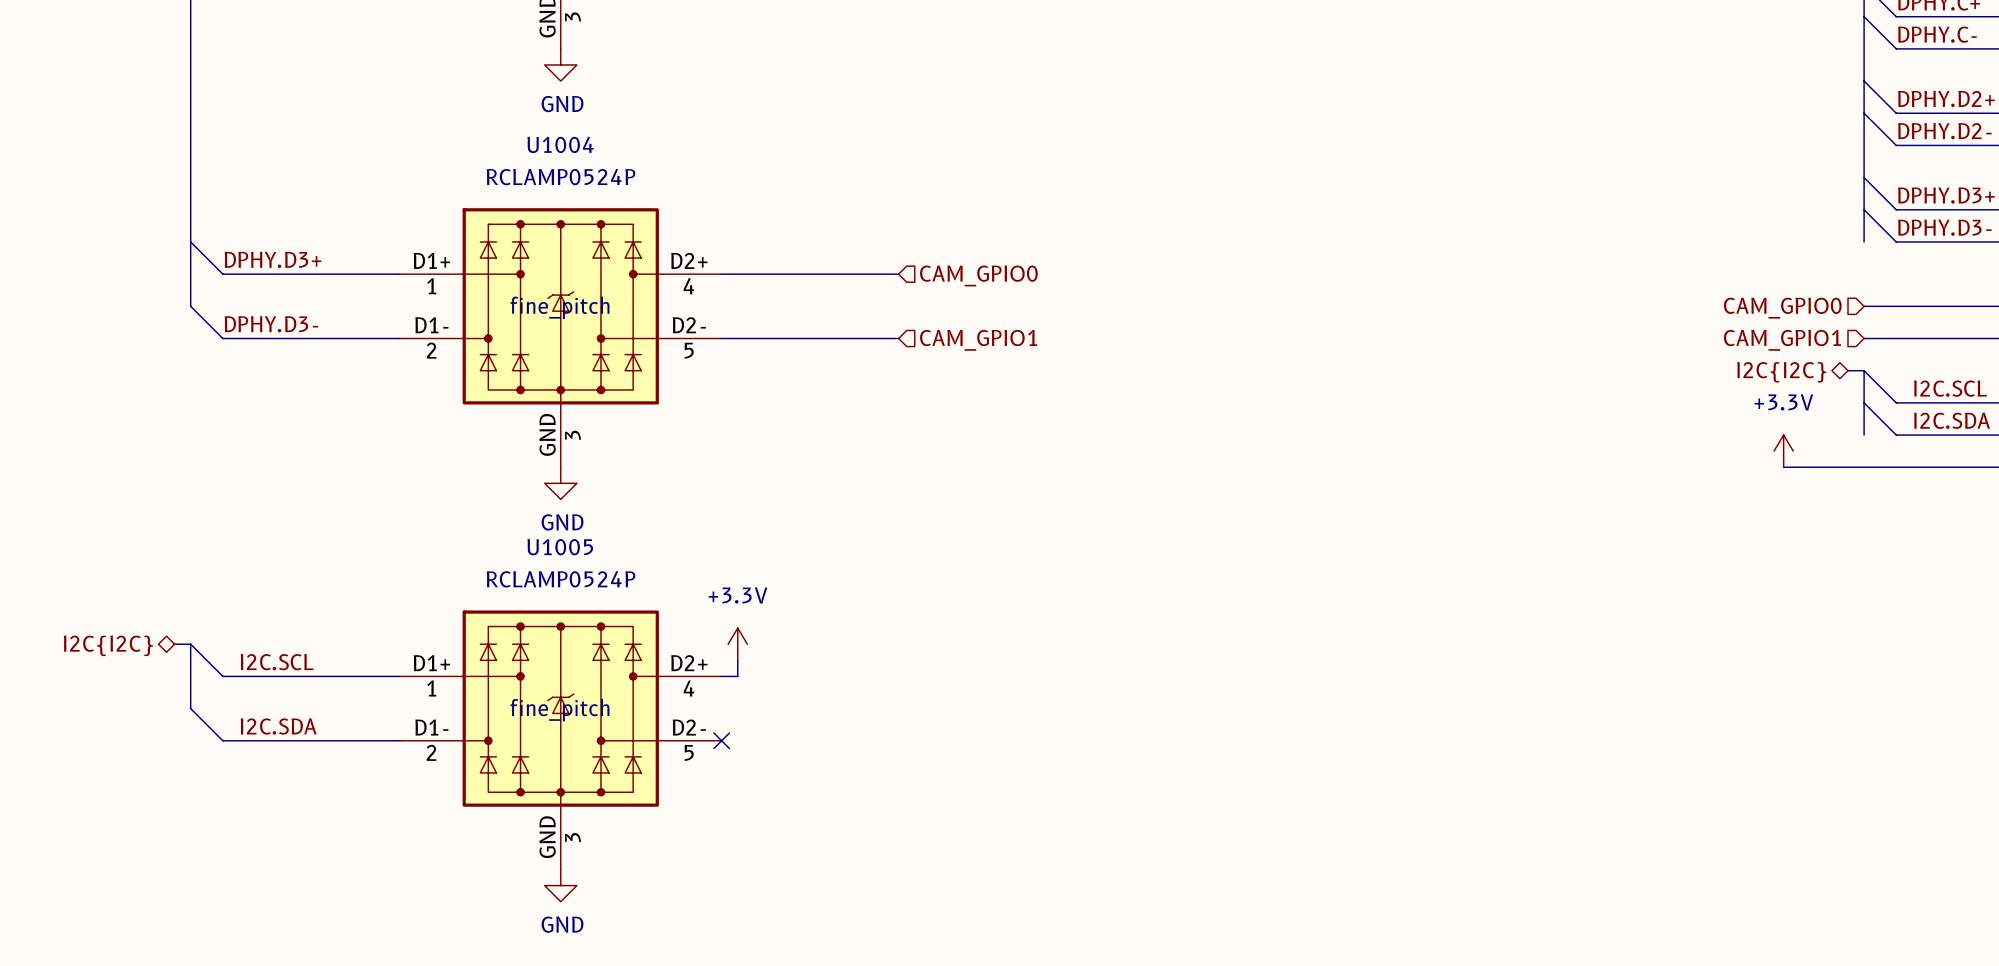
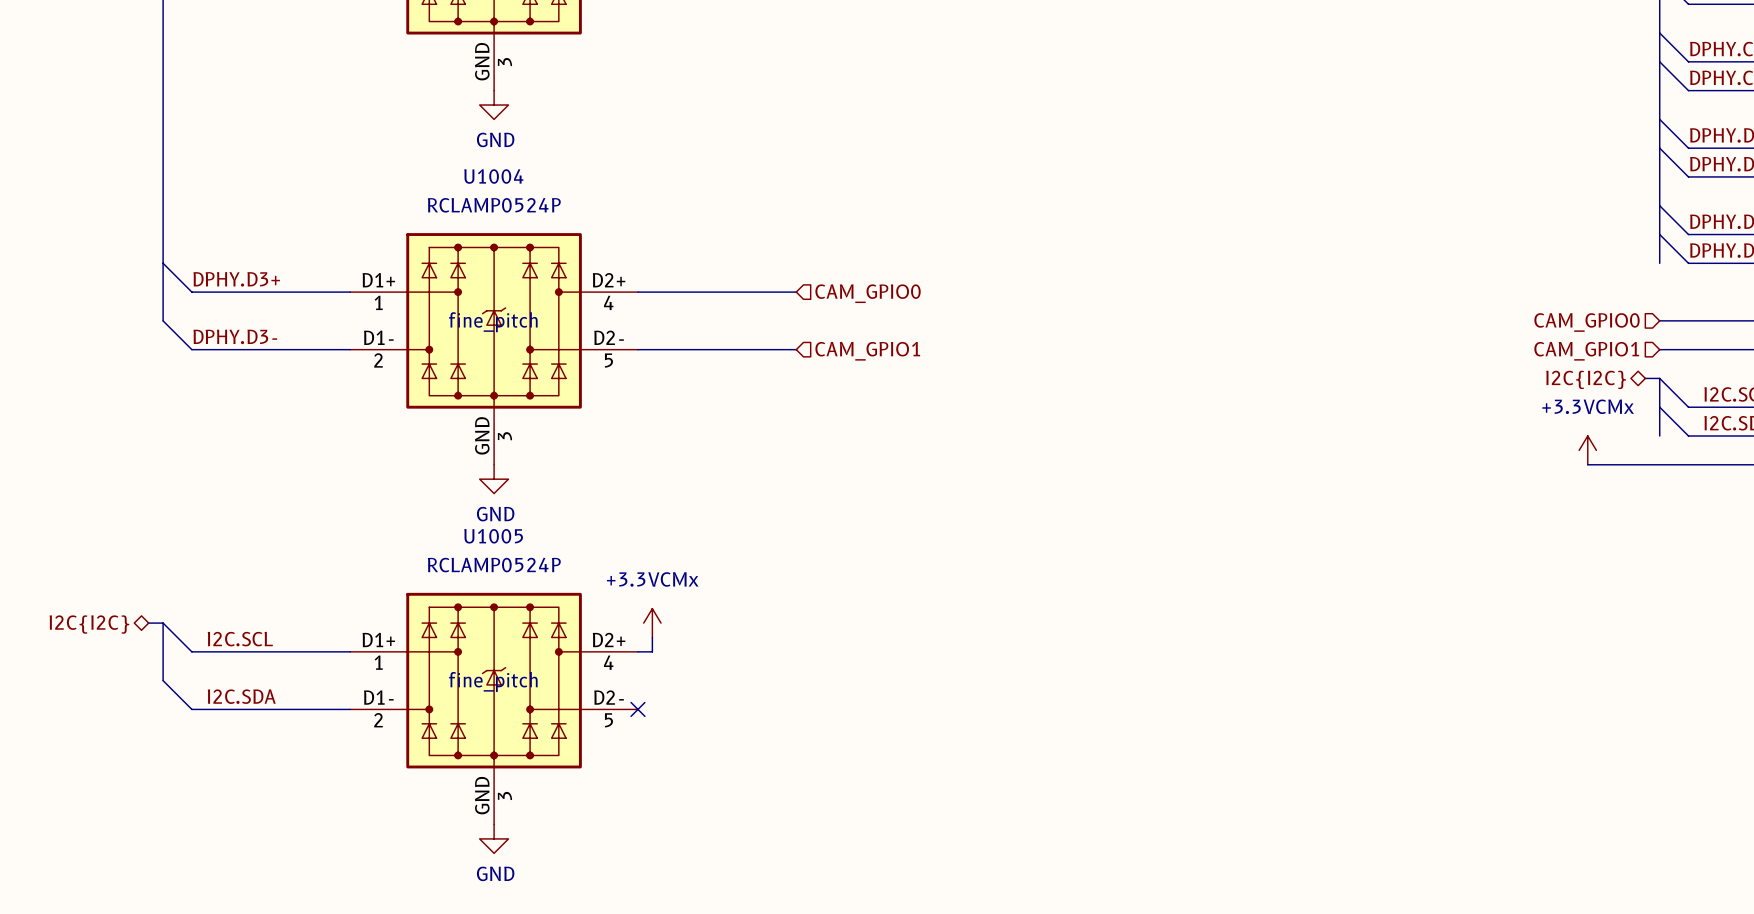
power symbol: +3.3V (1783, 451) -> +3.3VCMx (1587, 450)
power symbol: +3.3V (737, 644) -> +3.3VCMx (652, 623)

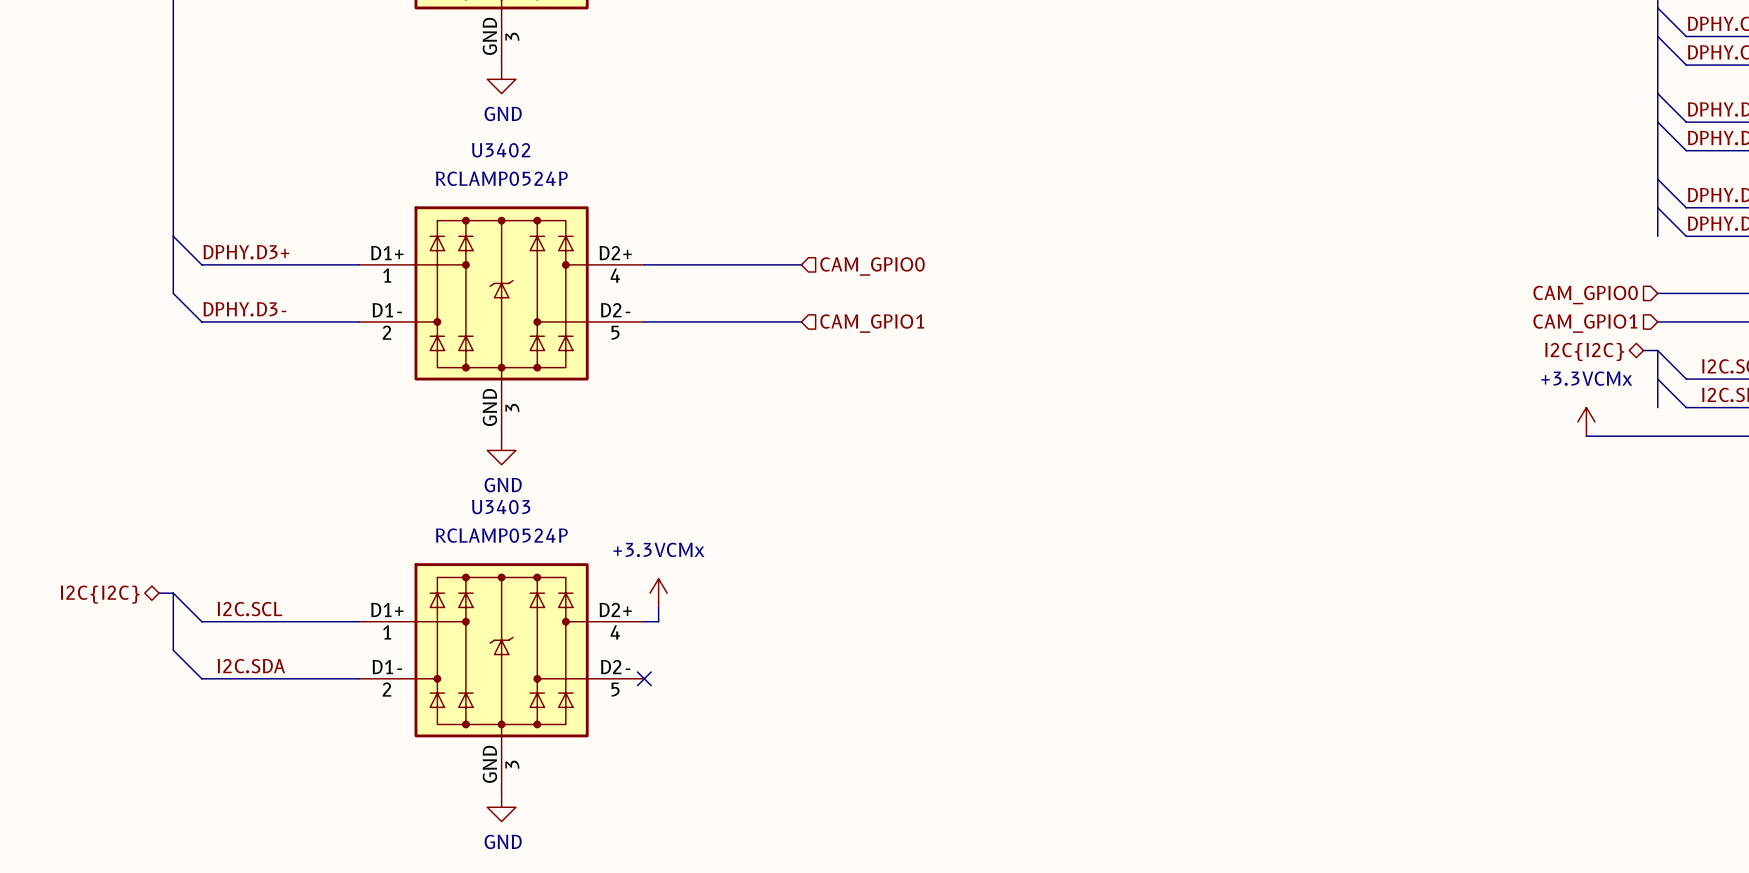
U1004 name: U1004 (493, 176) -> U3402 (501, 150)
U1004 text: fine_pitch (493, 322) -> none
U1005 name: U1005 (493, 536) -> U3403 (501, 507)
U1005 text: fine_pitch (493, 682) -> none

